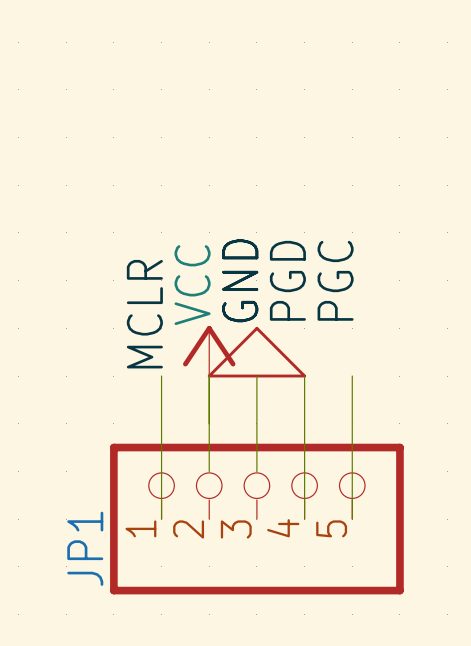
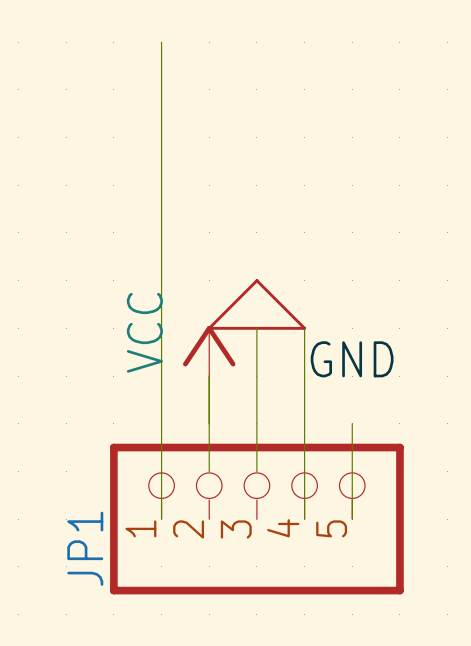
wire: none -> (161, 42) (161, 376)
label rotation: 0° (240, 280) -> 90° clockwise (352, 359)
label position: GND (240, 280) -> GND (352, 359)
label: PGD (287, 280) -> none
label: PGC (335, 280) -> none
power symbol text position: VCC (192, 285) -> VCC (144, 332)
label: MCLR (144, 314) -> none
wire: none -> (256, 328) (256, 376)
power symbol position: (256, 352) -> (256, 304)
wire: (352, 376) (352, 423) -> (304, 328) (304, 376)

